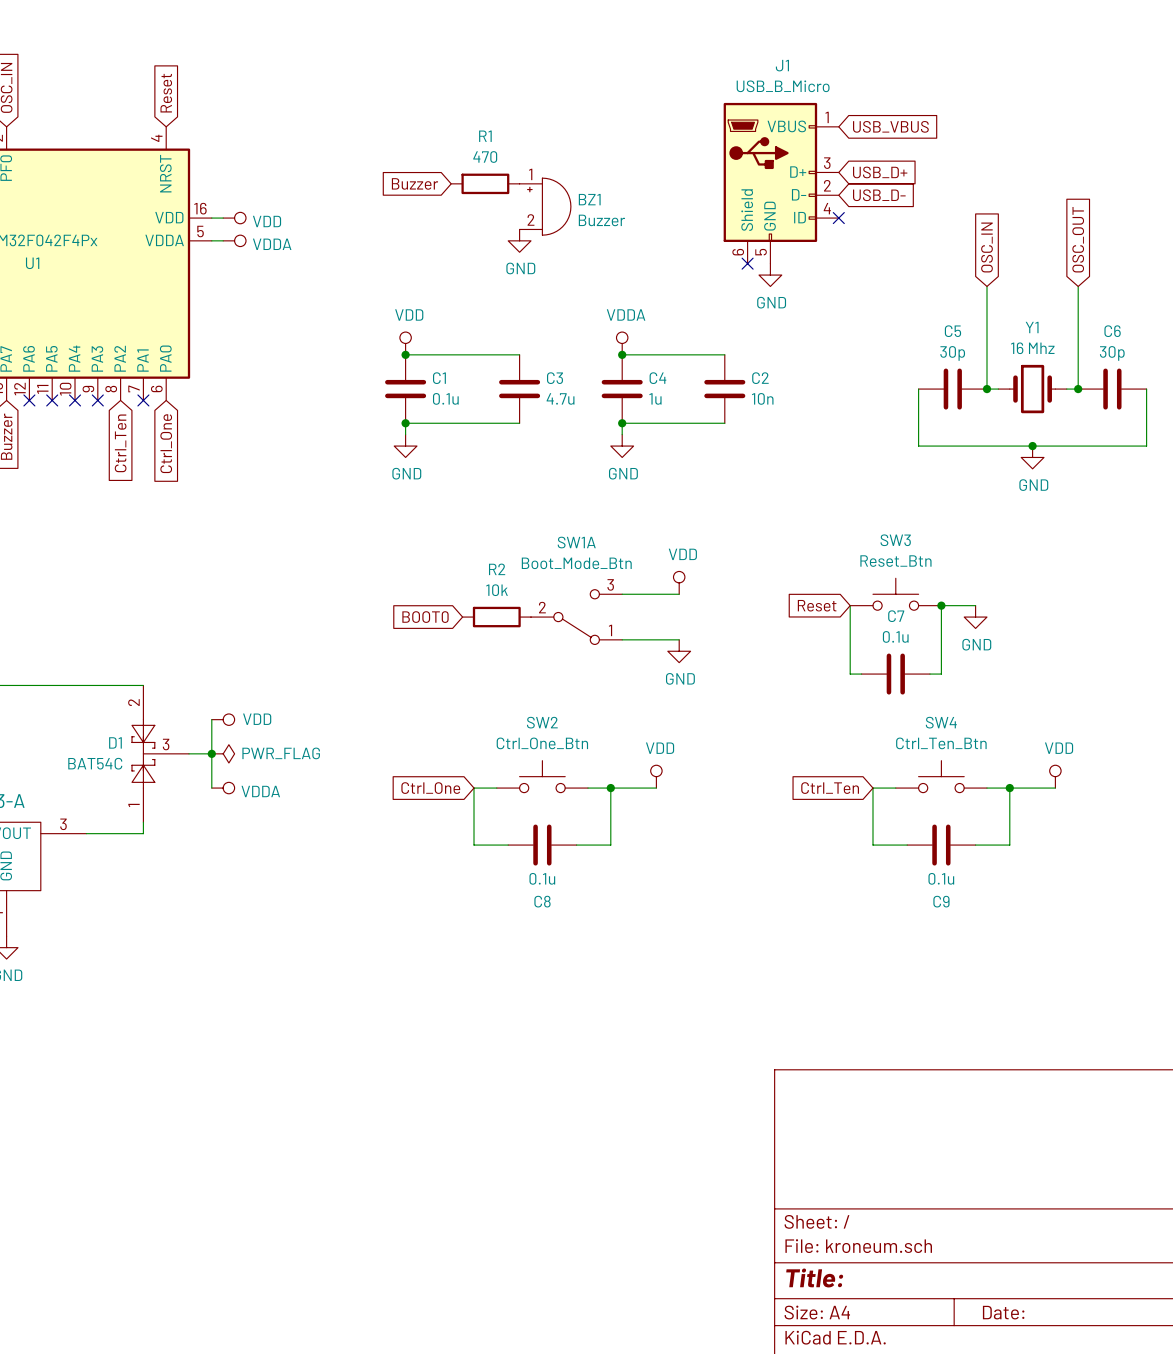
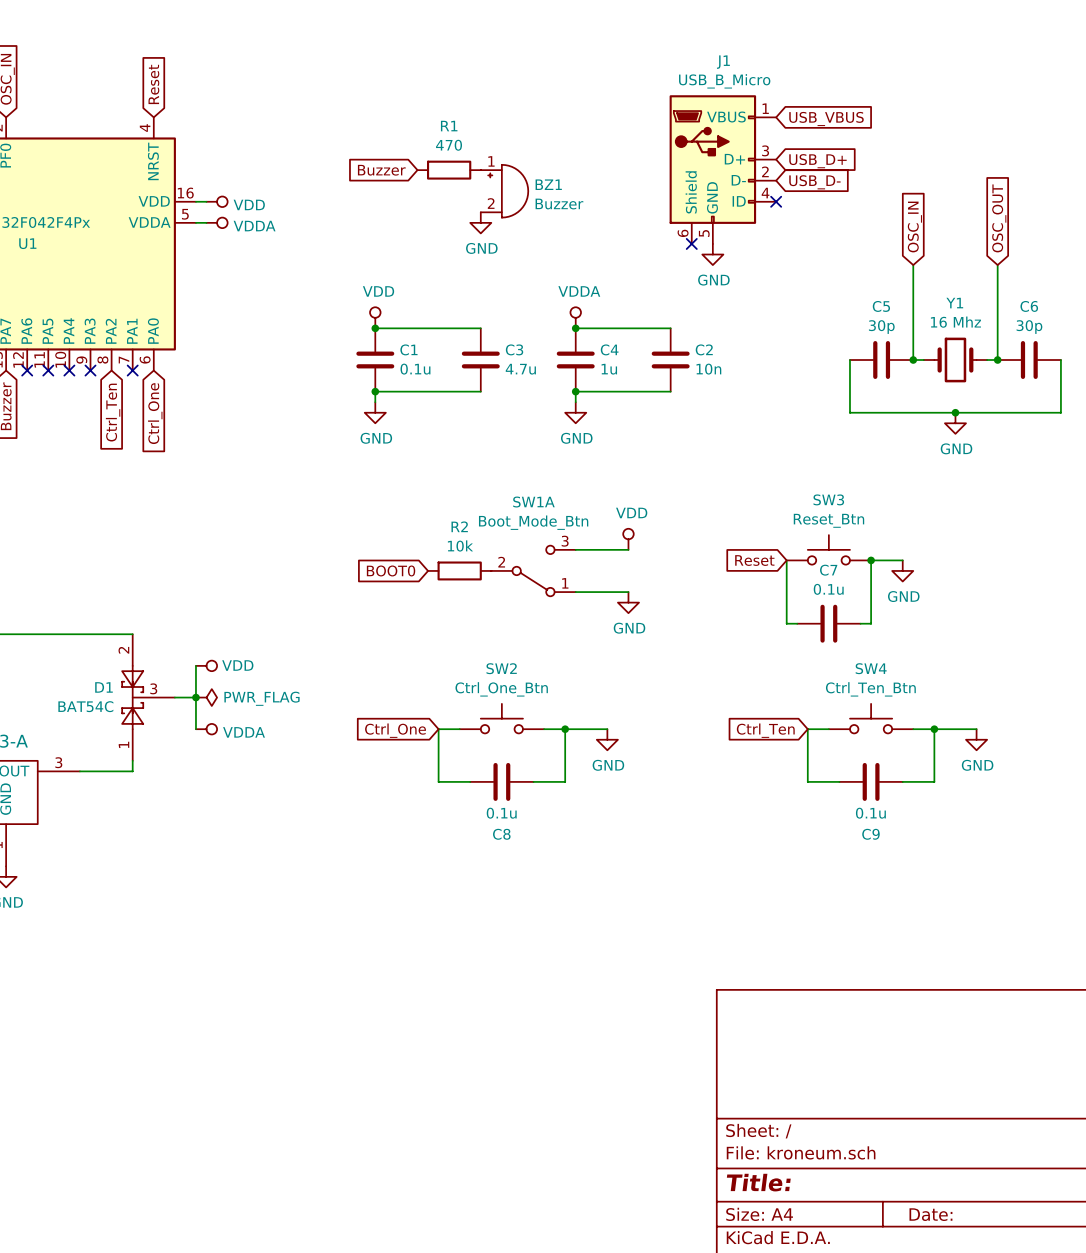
power symbol: VDD (656, 776) -> none
power symbol: VDD (1055, 776) -> none
power symbol: none -> GND (607, 739)
power symbol: none -> GND (976, 739)

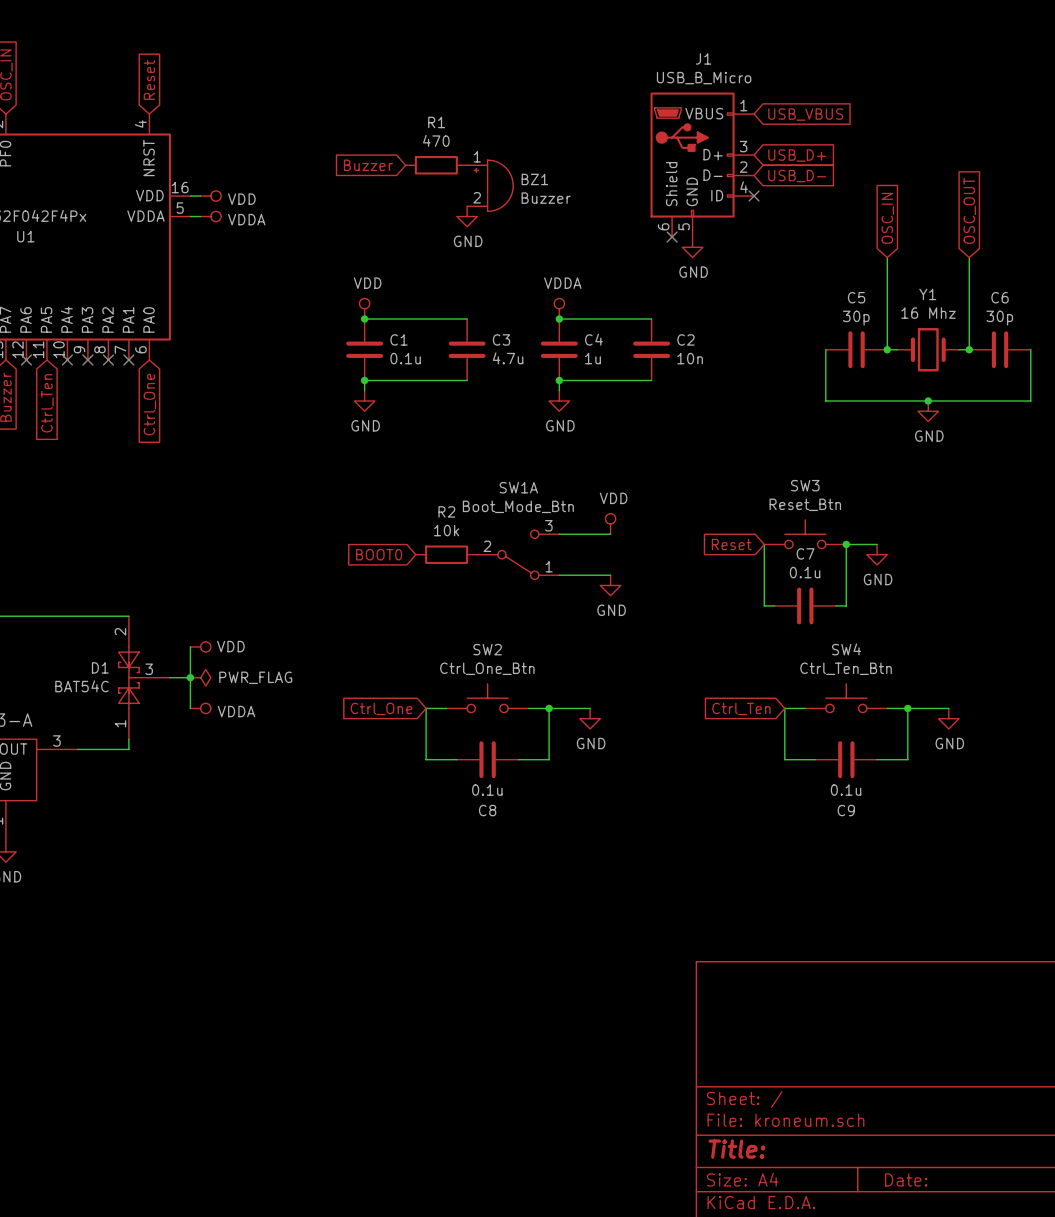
no-connect mark: (48, 370) -> none
no-connect mark: none -> (108, 360)
global label position: Ctrl_Ten (113, 412) -> Ctrl_Ten (47, 403)

